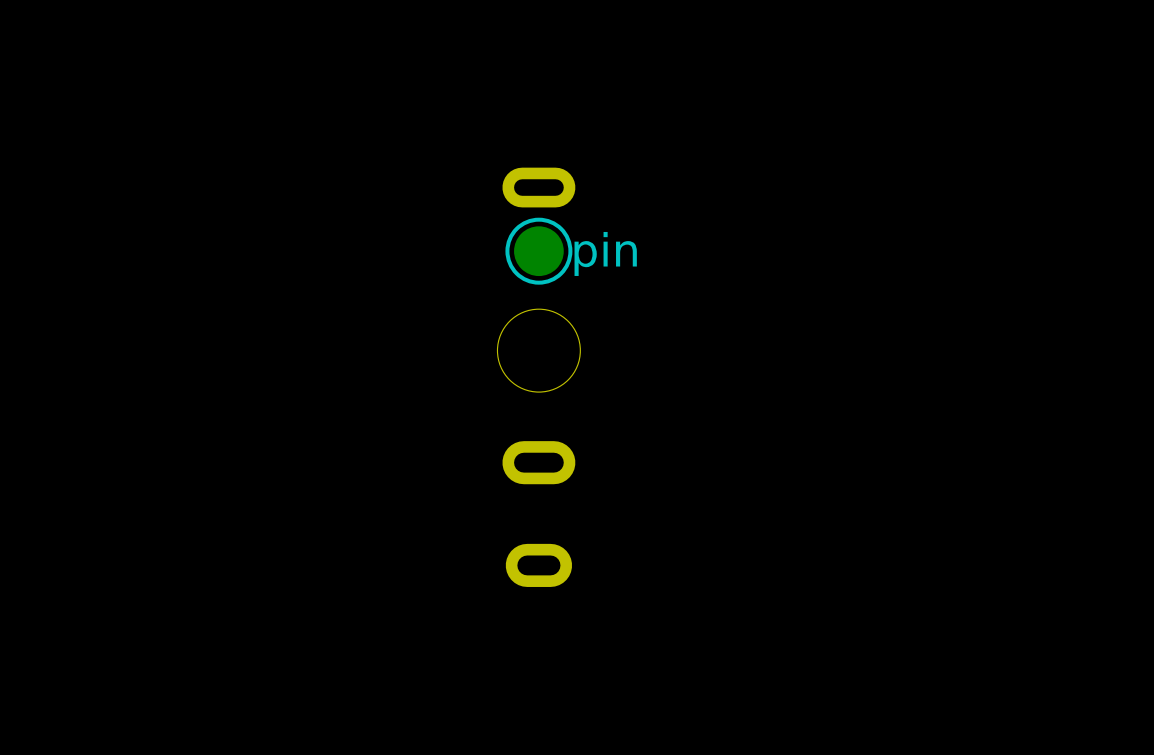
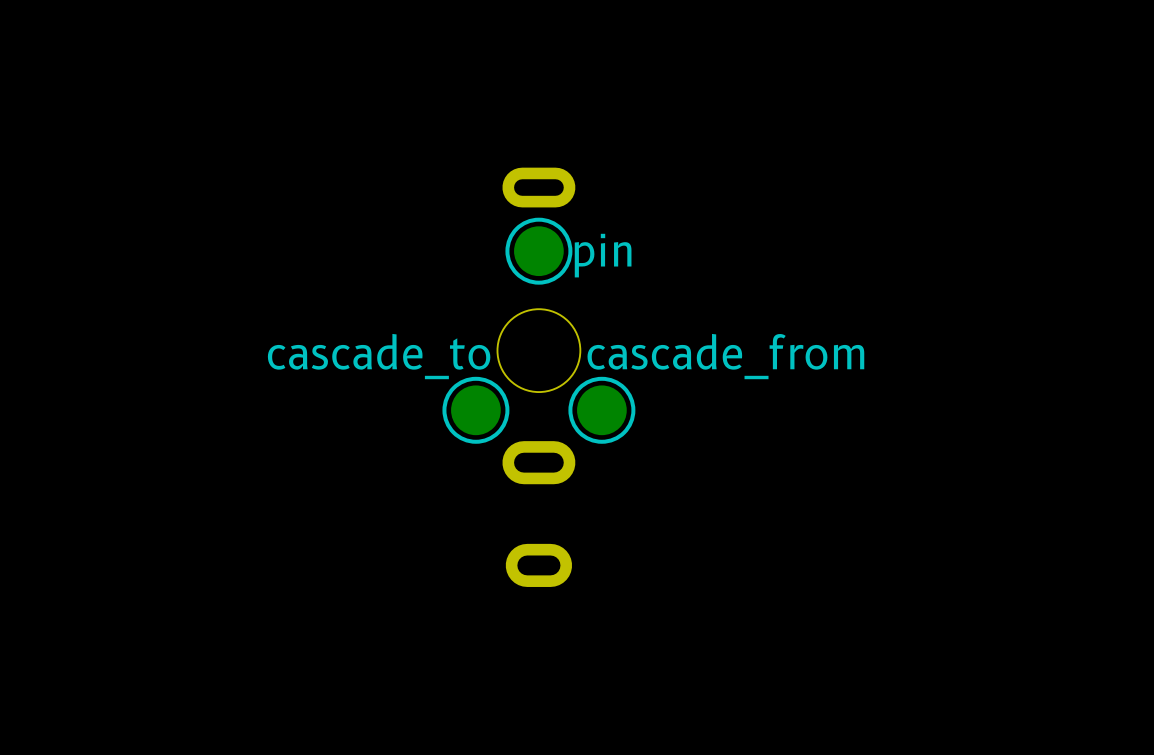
text: none -> cascade_to (379, 356)
text: none -> cascade_from (725, 356)
part: none -> (475, 410)
part: none -> (601, 410)

